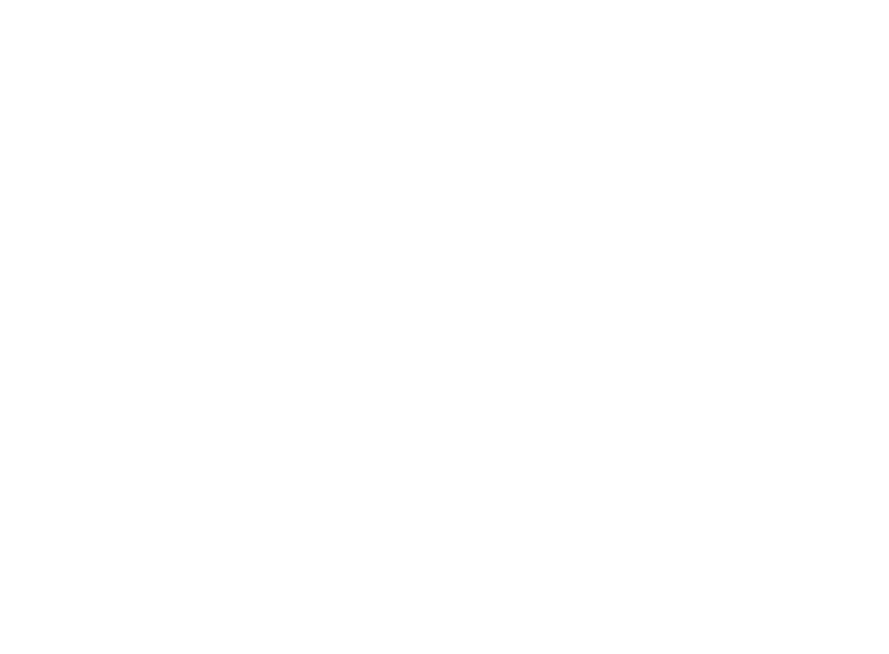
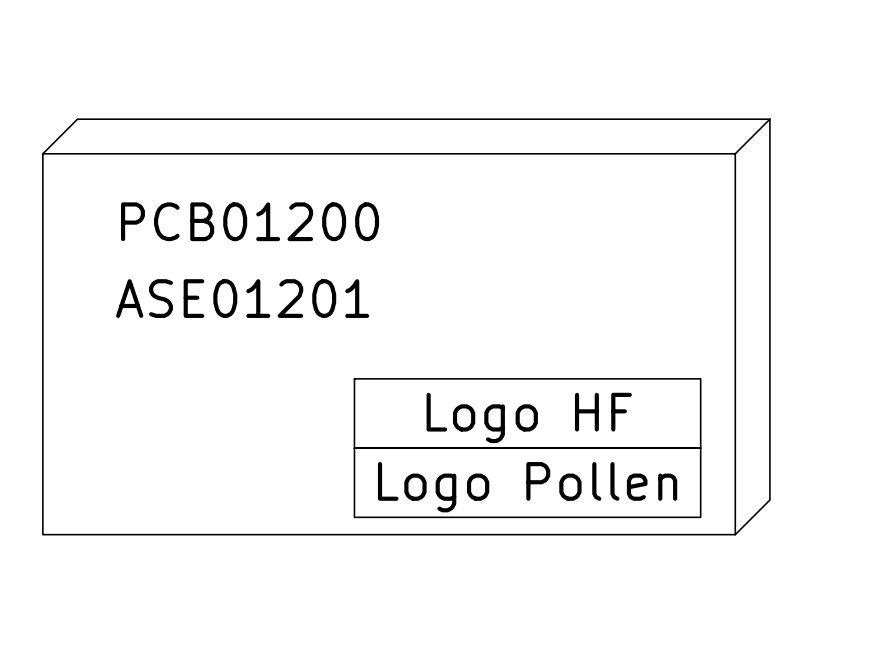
text: none -> ASE01201 (242, 298)
part: none -> PCB01200 (406, 326)
part: none -> (527, 413)
part: none -> (527, 482)

